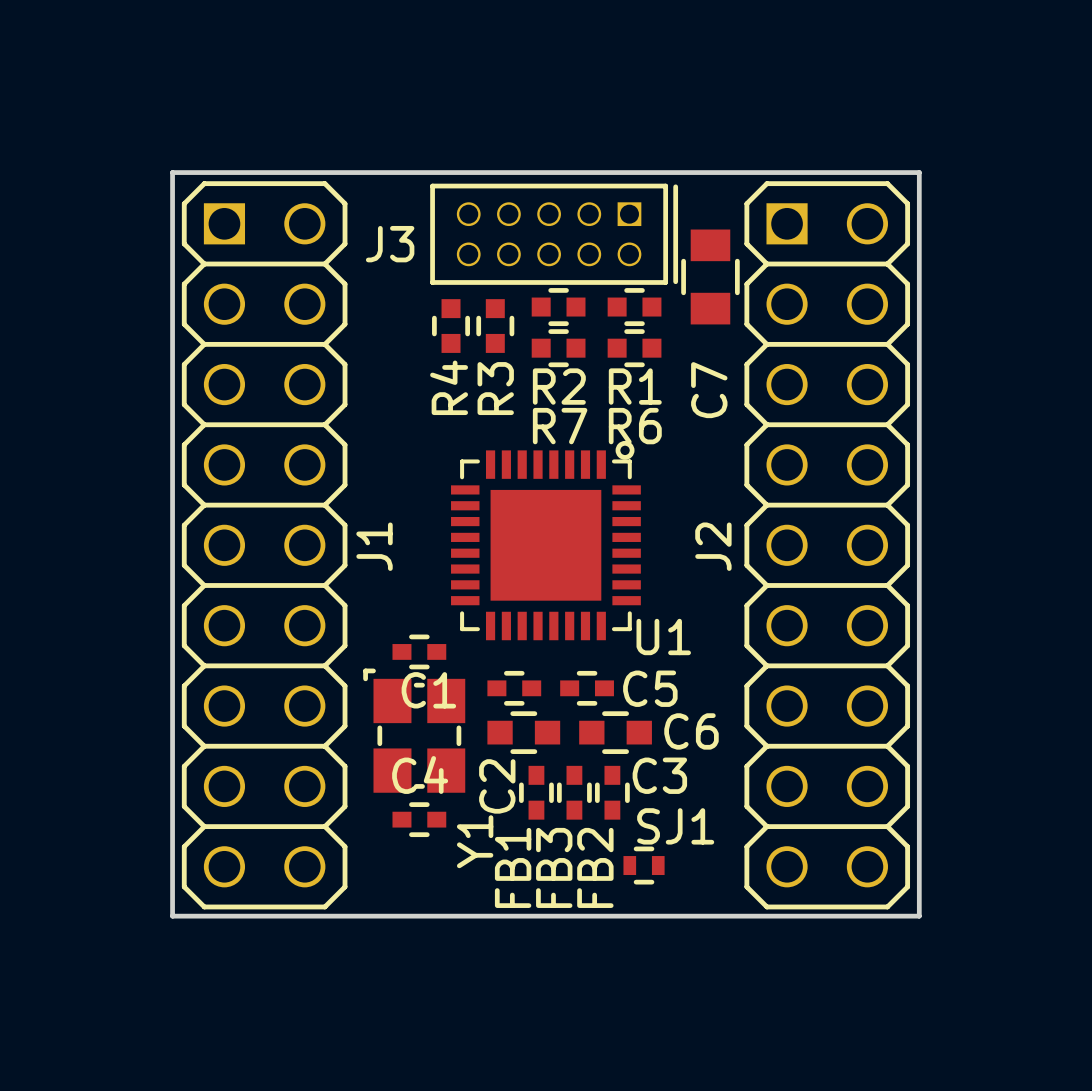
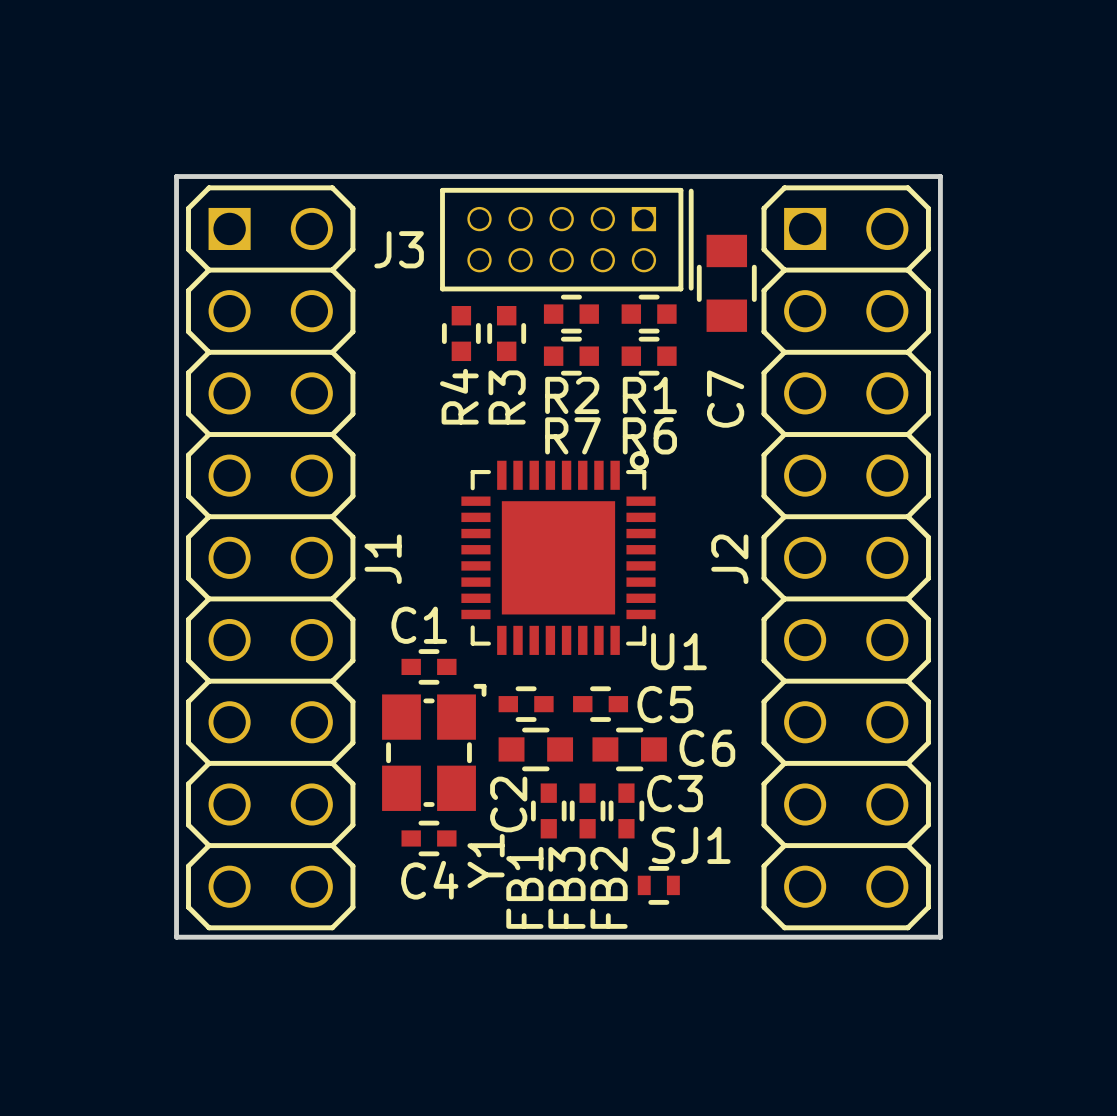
Y1 footprint: [363, 668, 466, 793] -> [382, 683, 487, 811]
C1 name position: C1 (428, 690) -> C1 (419, 625)
C4 name position: C4 (420, 774) -> C4 (429, 880)

